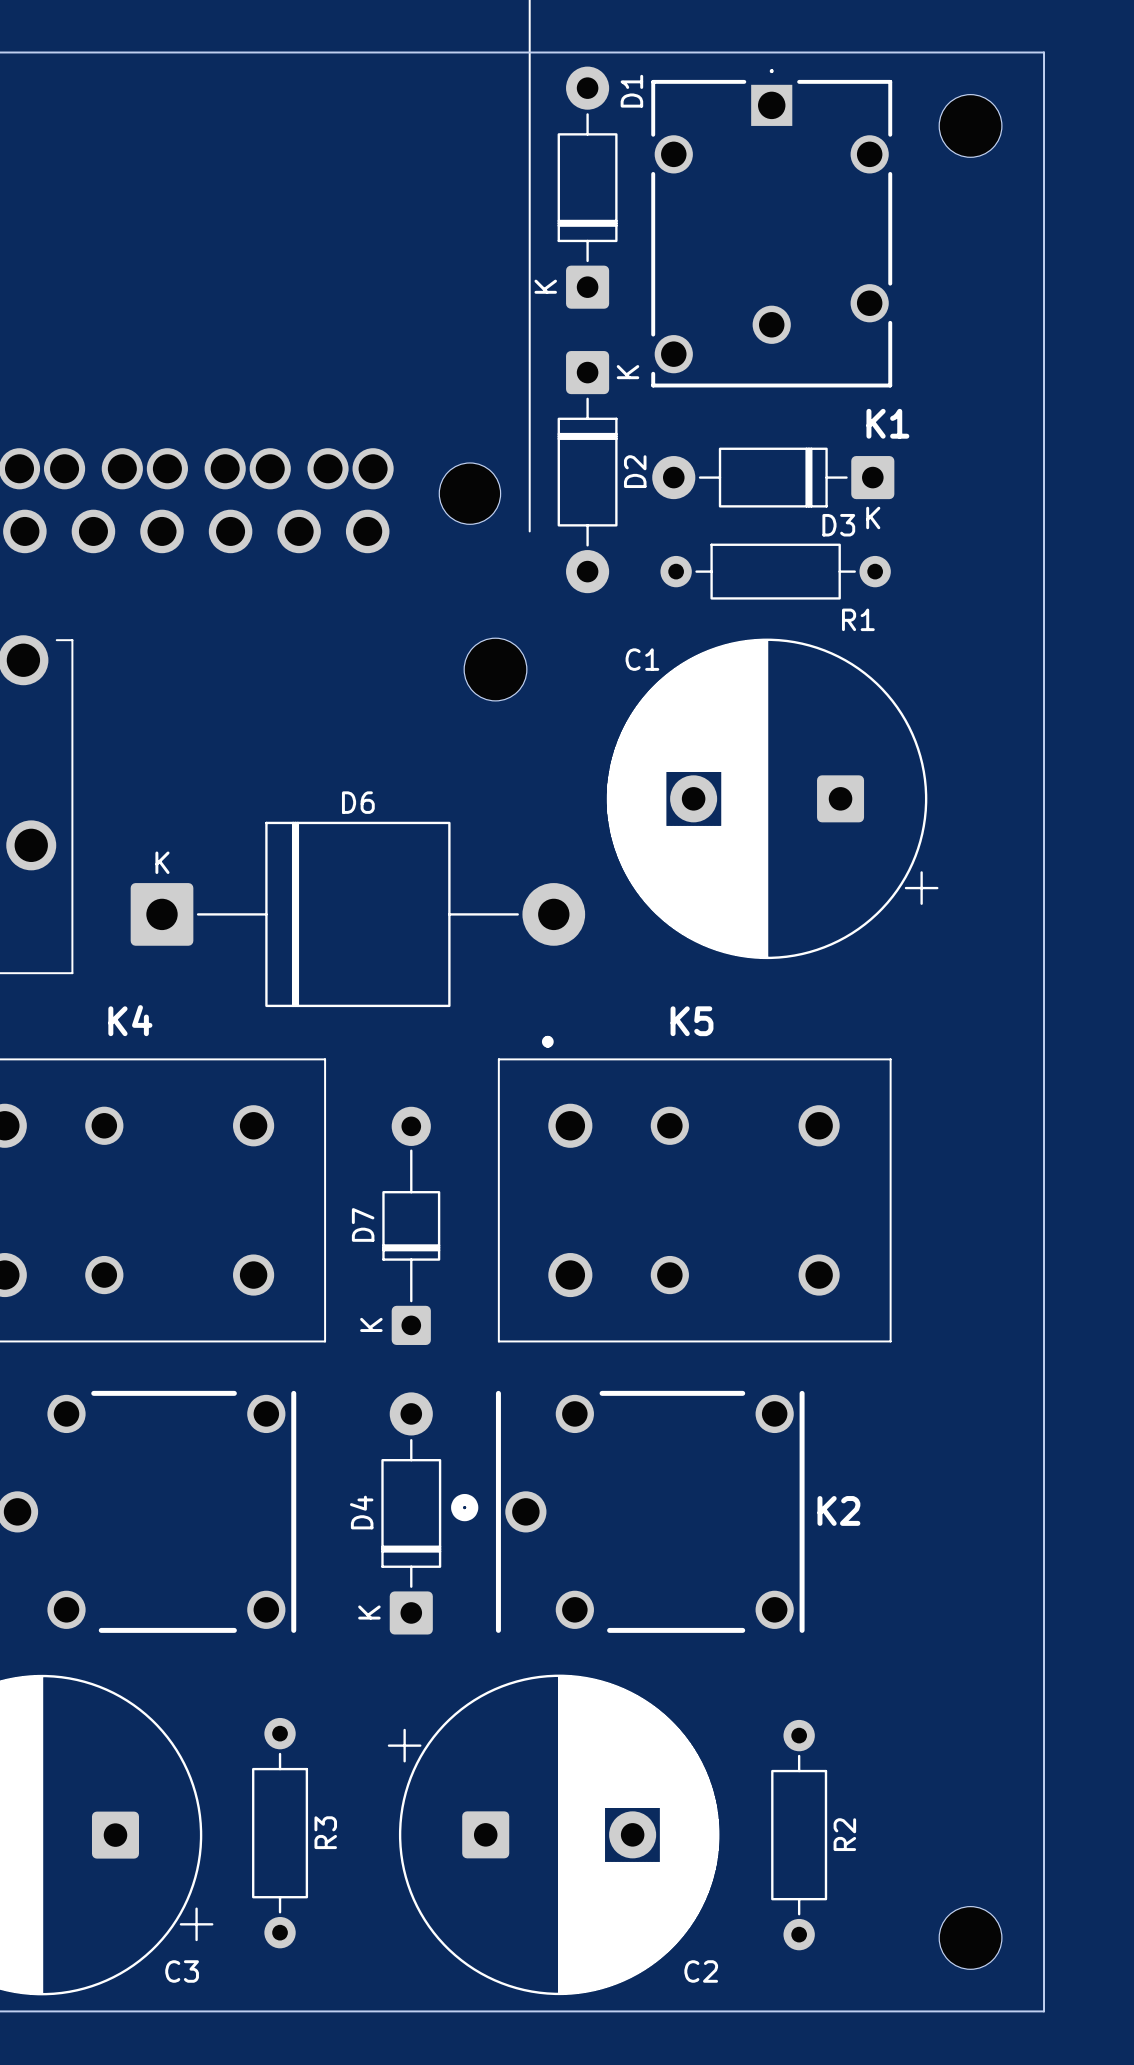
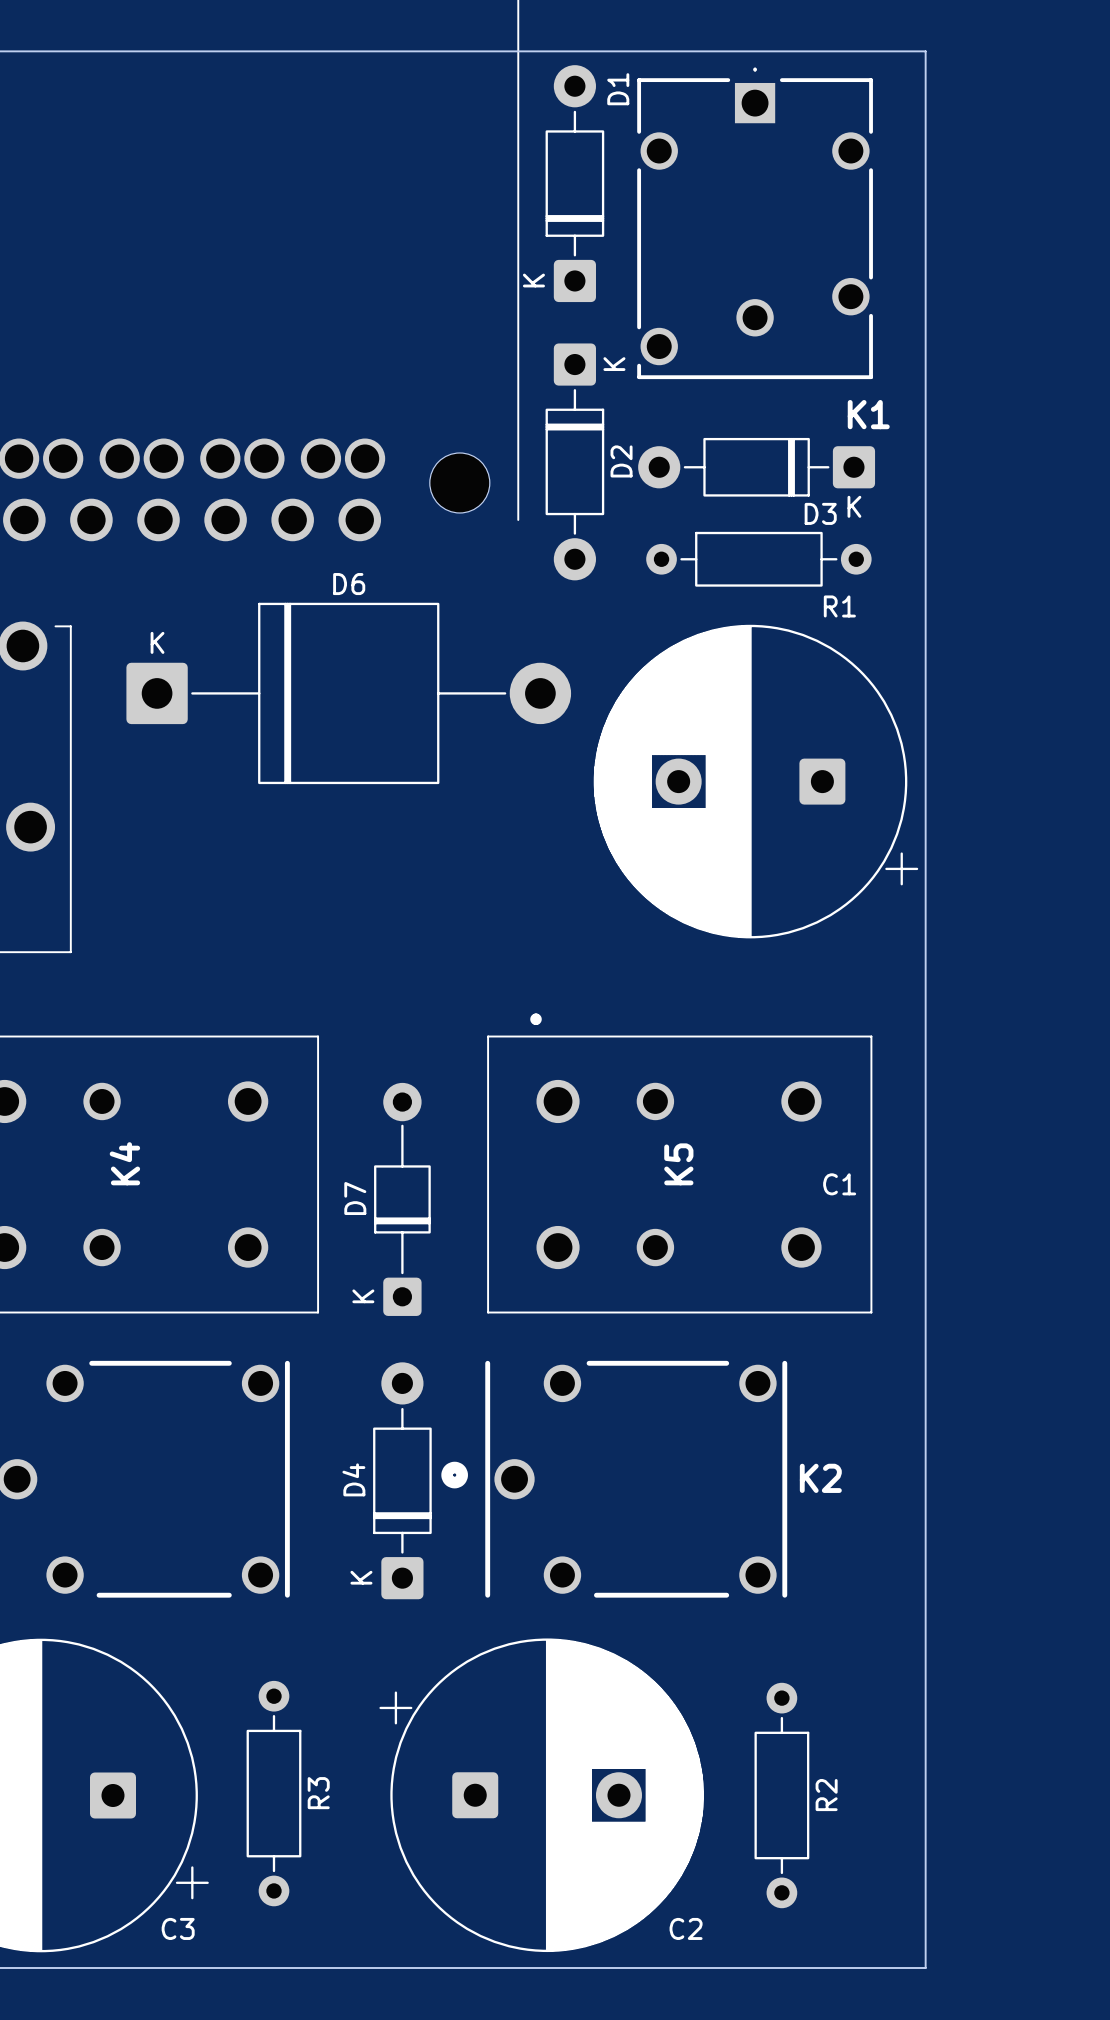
board edge: (946, 52) (1044, 52) (1044, 2011) (946, 2011) -> (925, 51) (925, 1968)
part: (970, 125) -> none
C1 name position: C1 (642, 659) -> C1 (839, 1184)
part: (495, 669) -> none
D6 position: (357, 914) -> (348, 693)
K4 name rotation: 0° (130, 1020) -> 90° counterclockwise (124, 1163)
K4 name position: K4 (130, 1020) -> K4 (124, 1163)
K5 name rotation: 0° (692, 1021) -> 90° counterclockwise (678, 1164)
K5 name position: K5 (692, 1021) -> K5 (678, 1164)
part: (970, 1937) -> none

